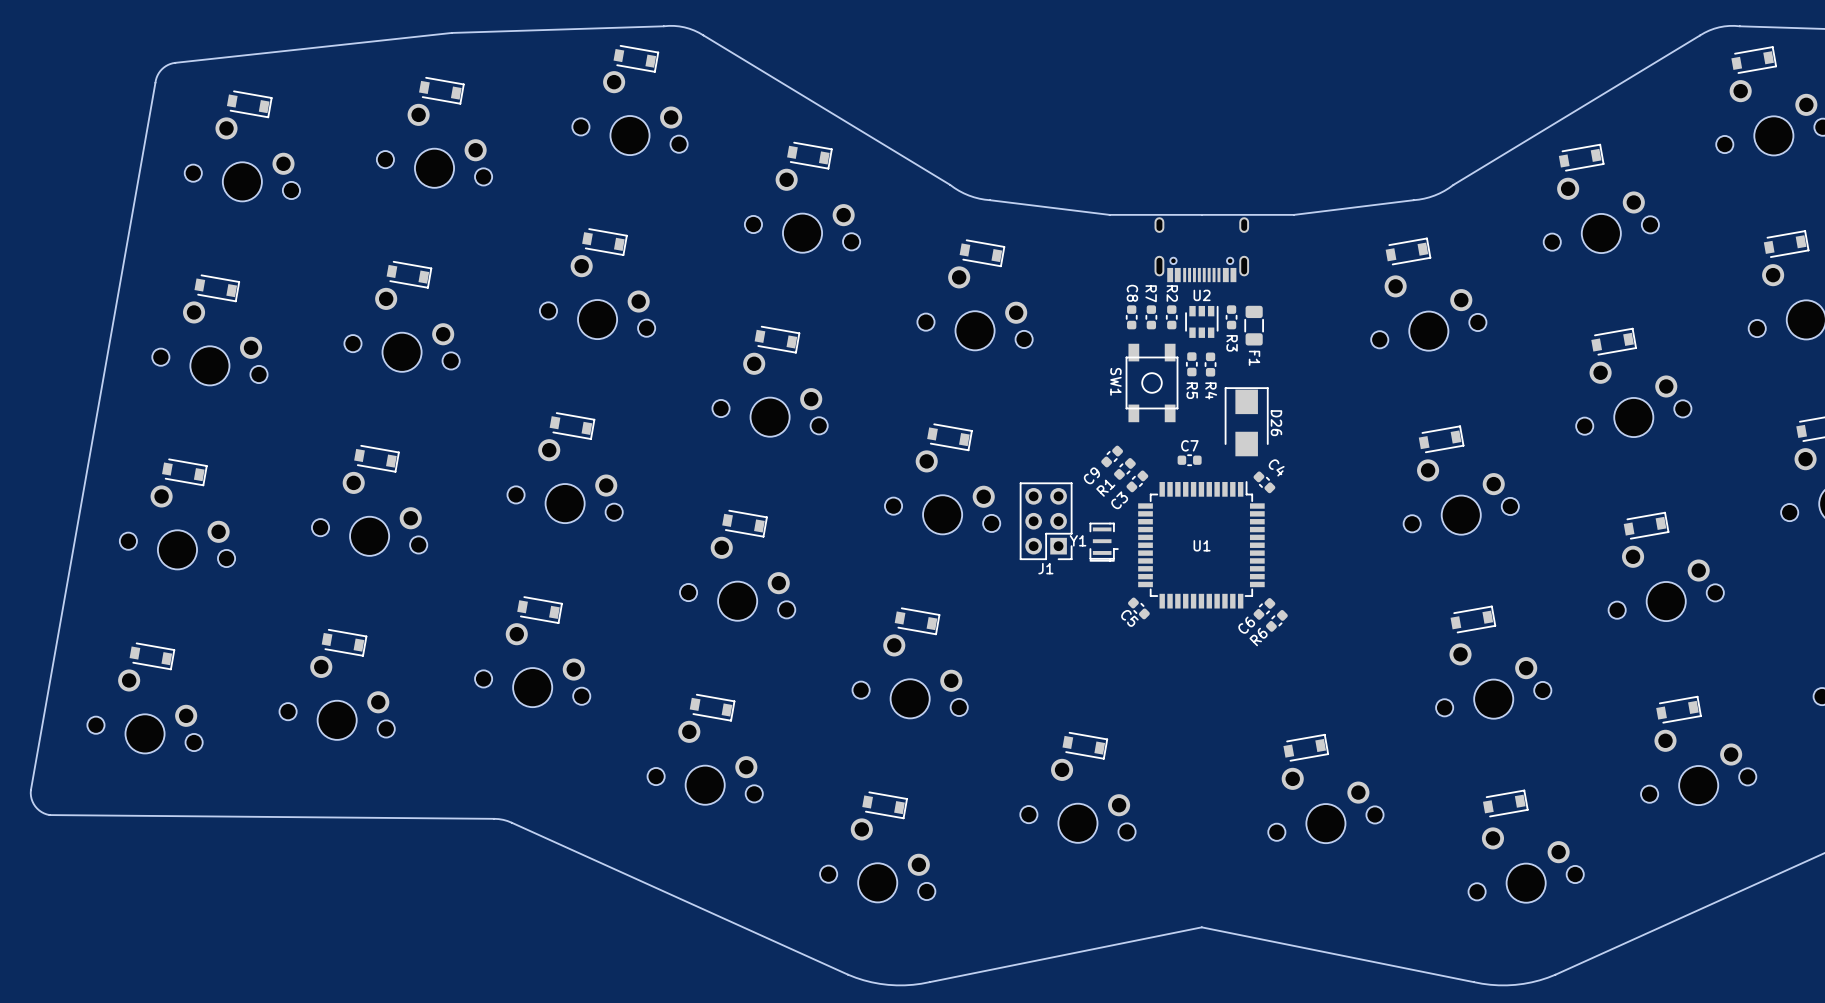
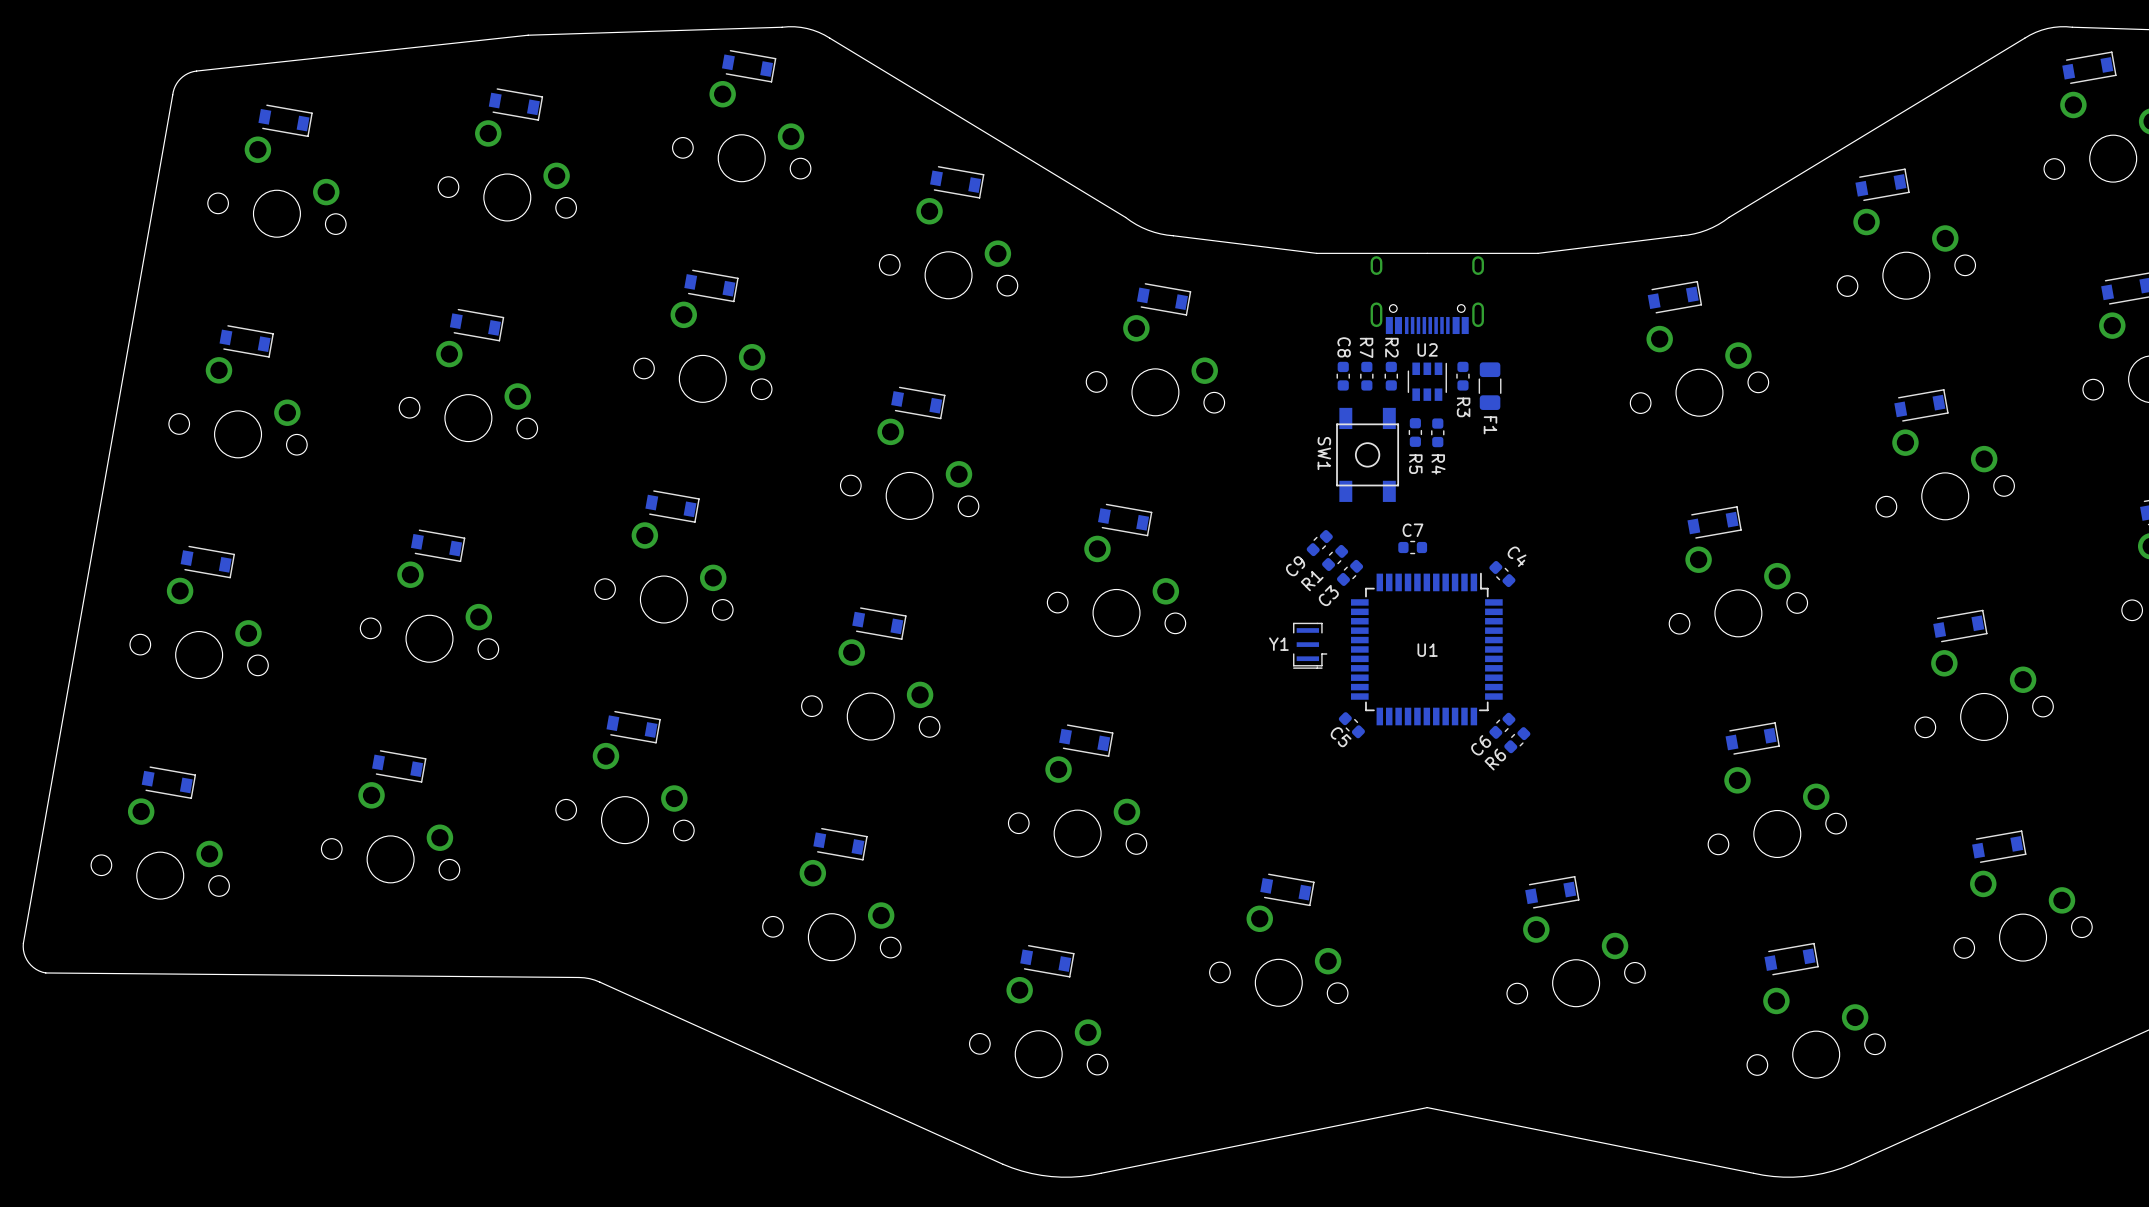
D26: (1246, 421) -> none
J1: (1046, 521) -> none

